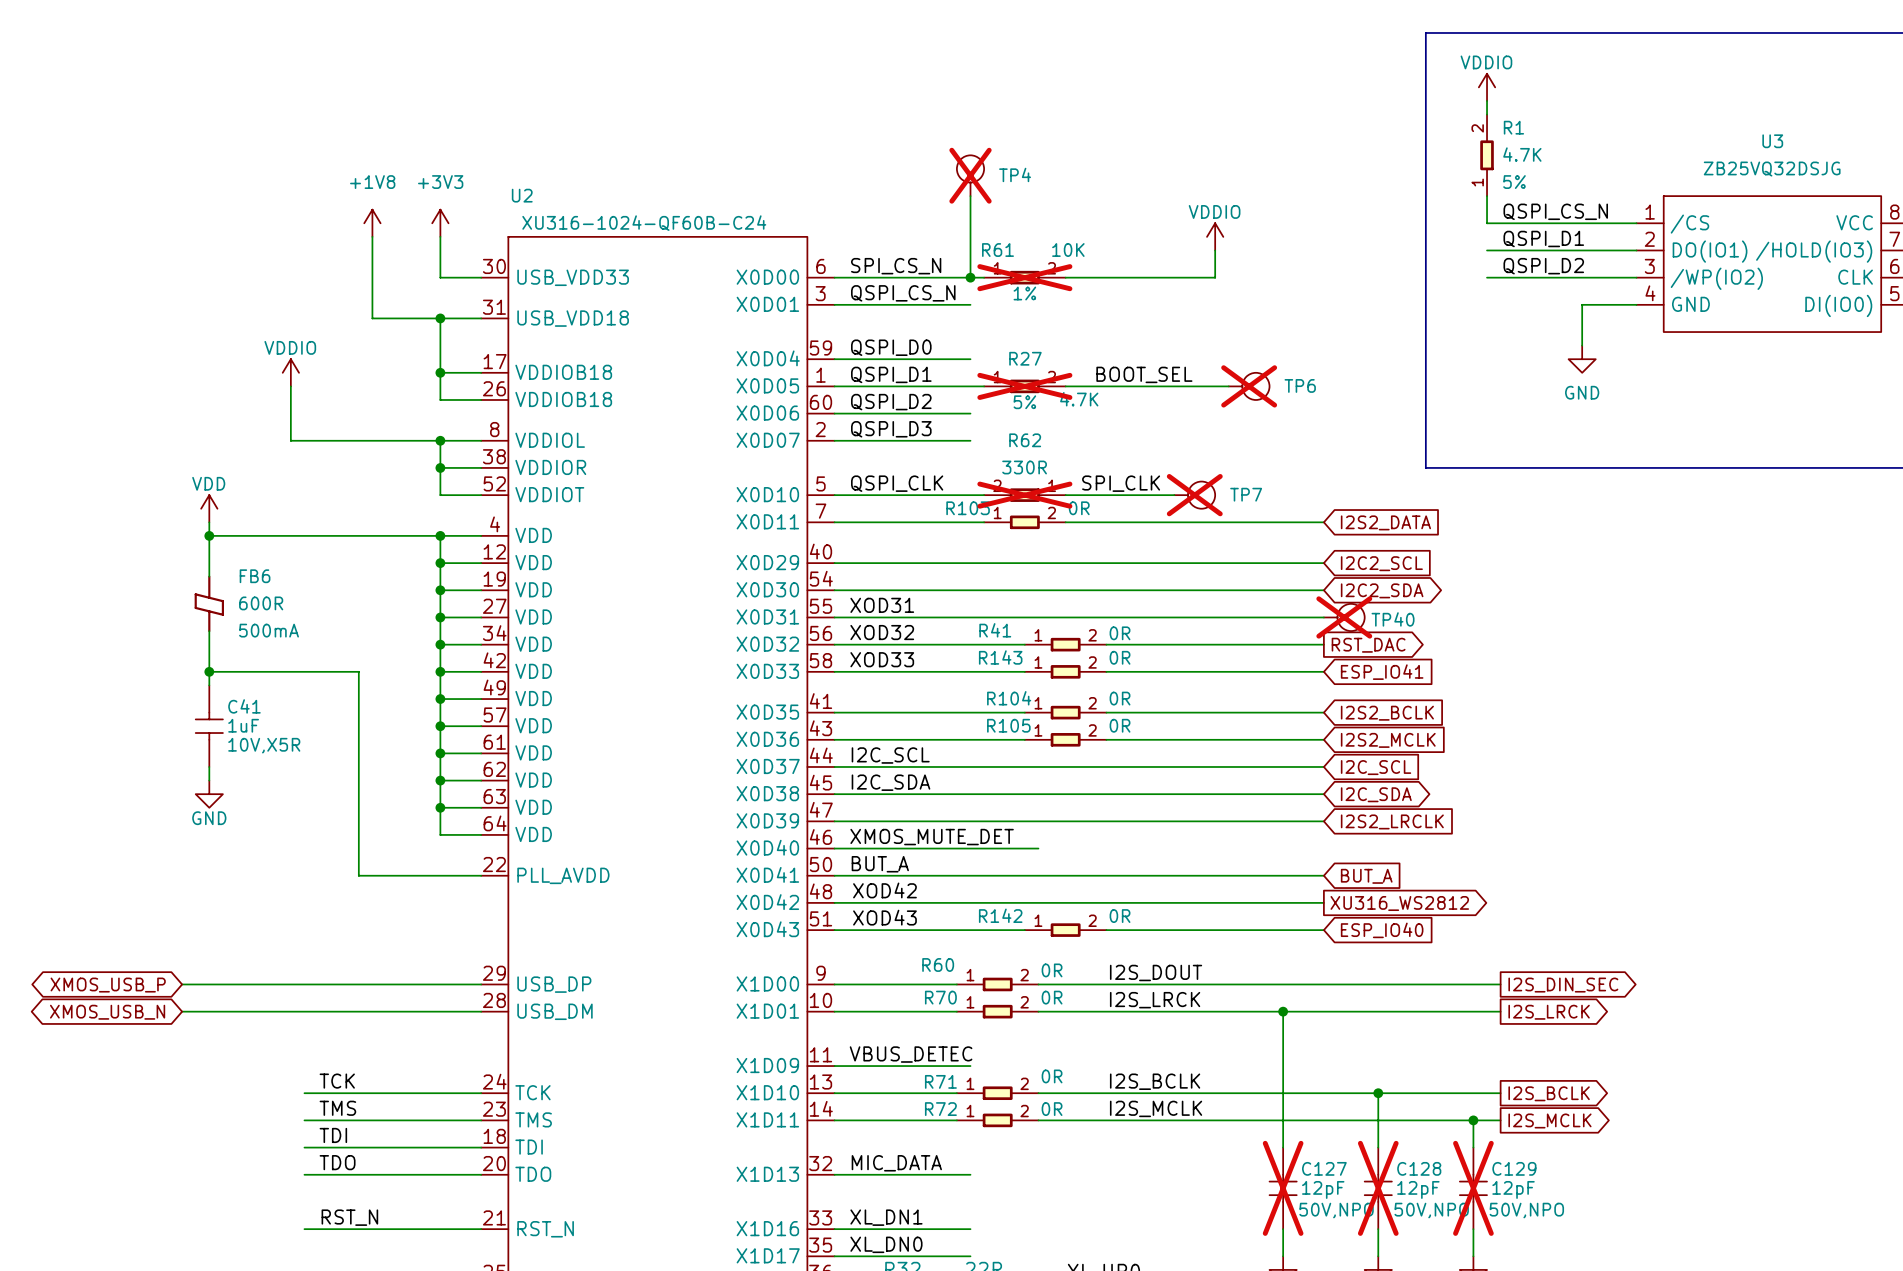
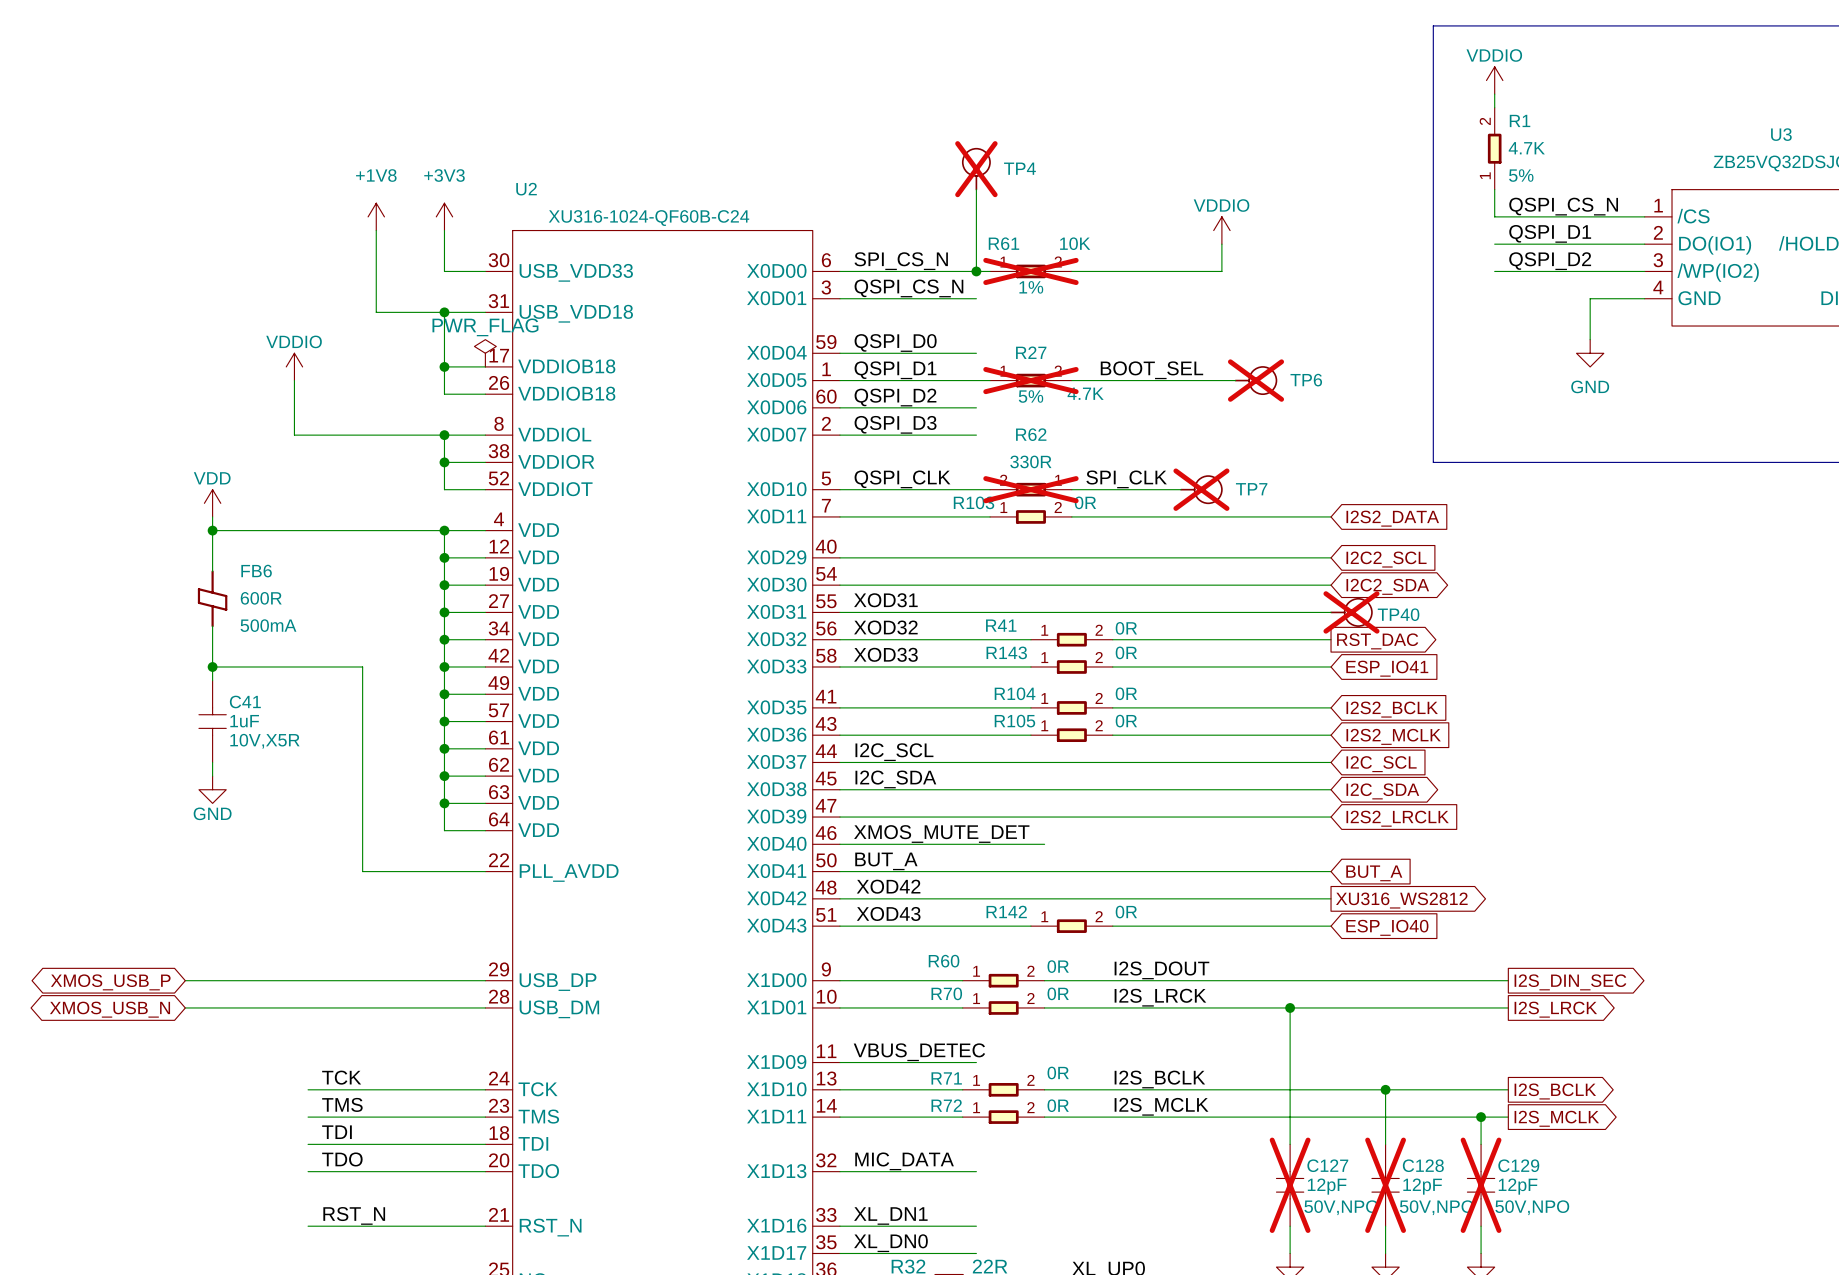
power symbol: none -> PWR_FLAG (485, 353)

